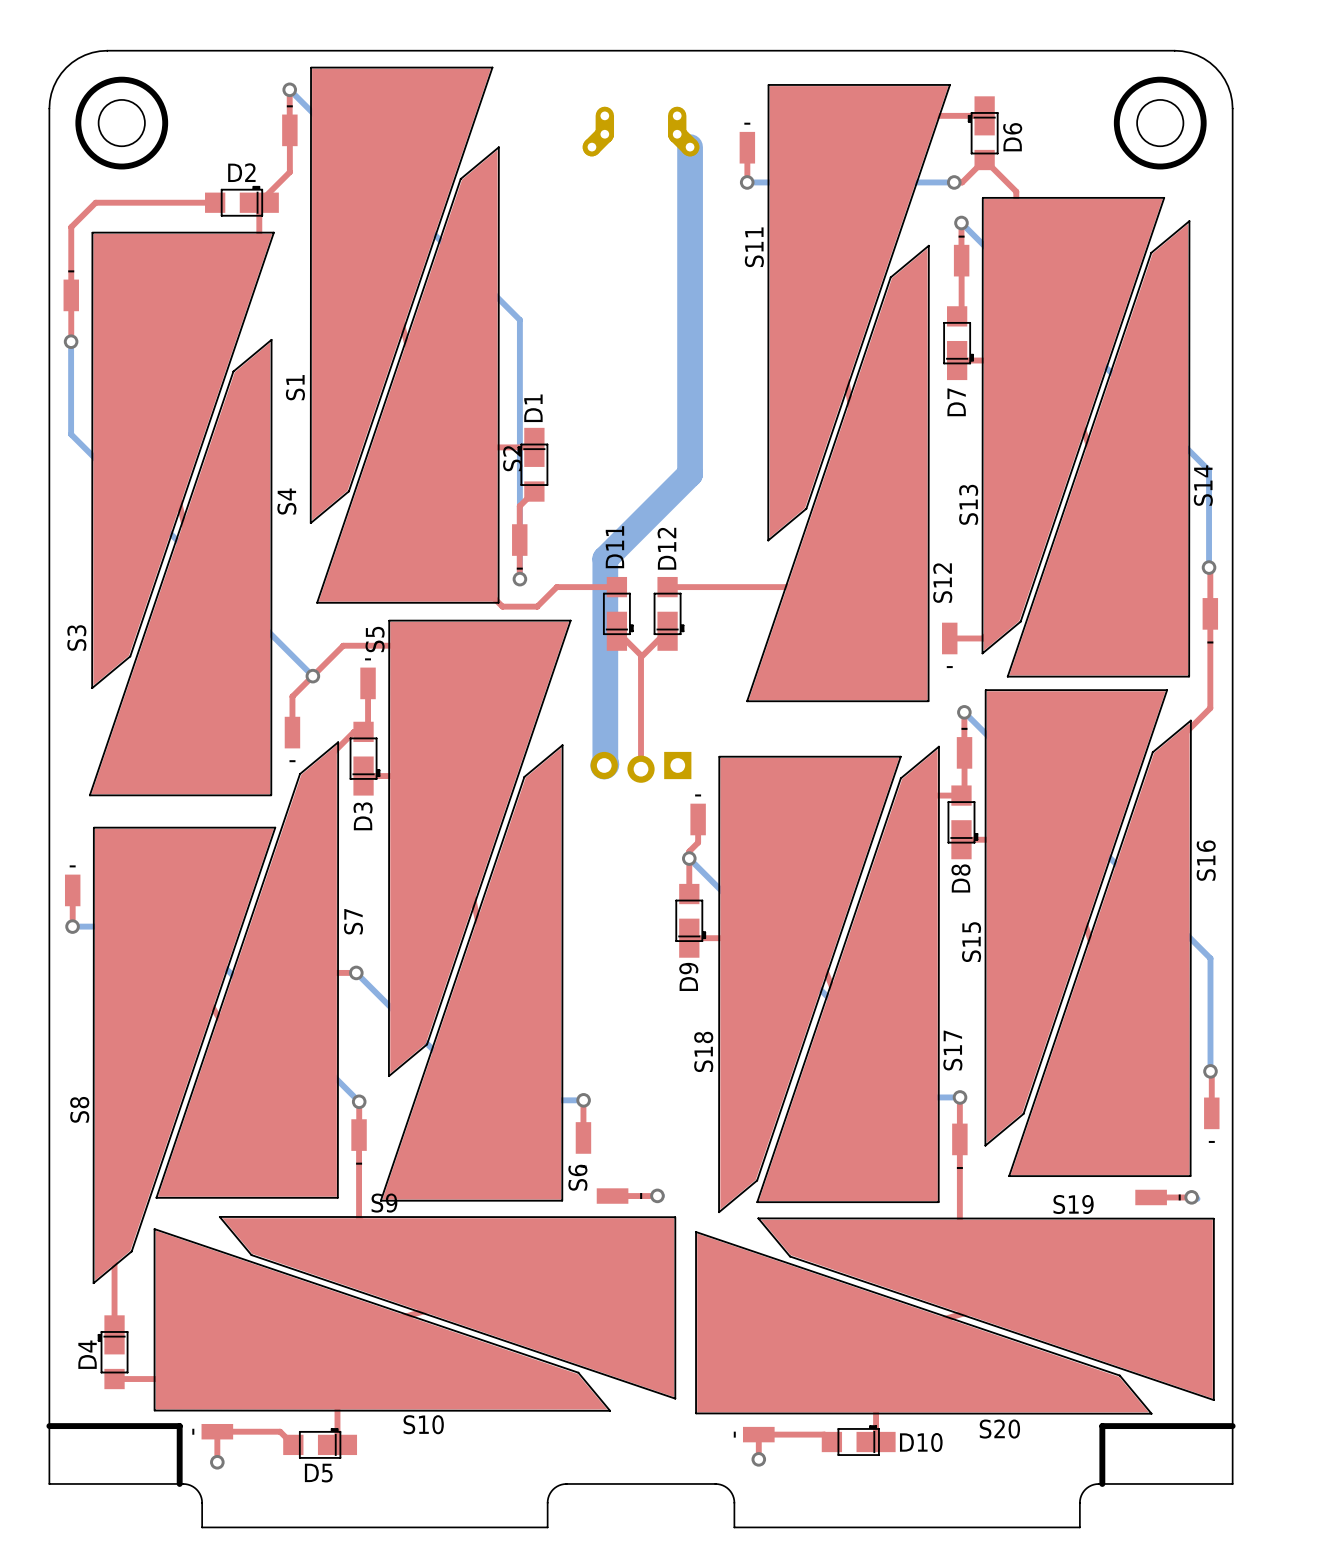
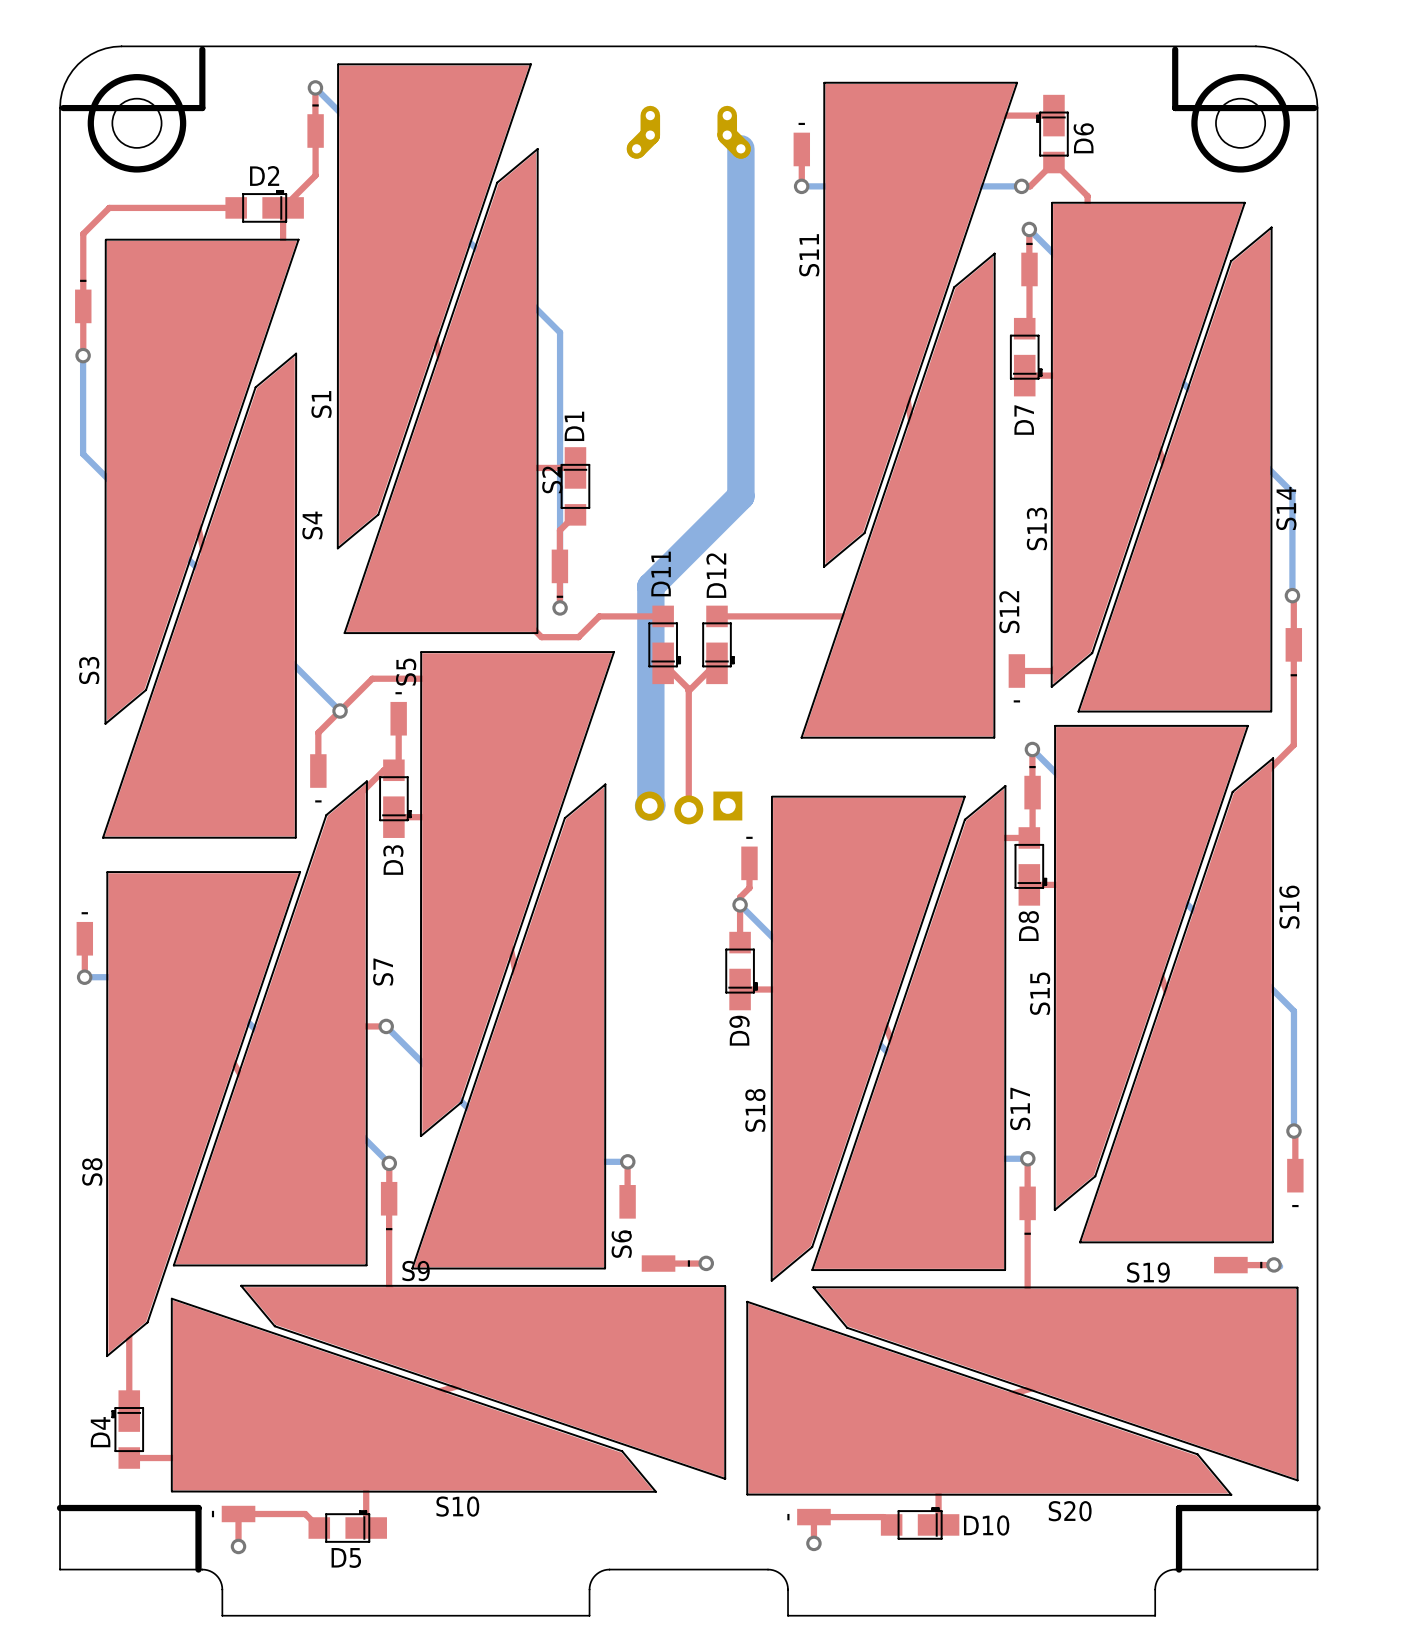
line: none -> (202, 49) (202, 108) (63, 108)
line: none -> (1175, 49) (1175, 108) (1314, 108)

